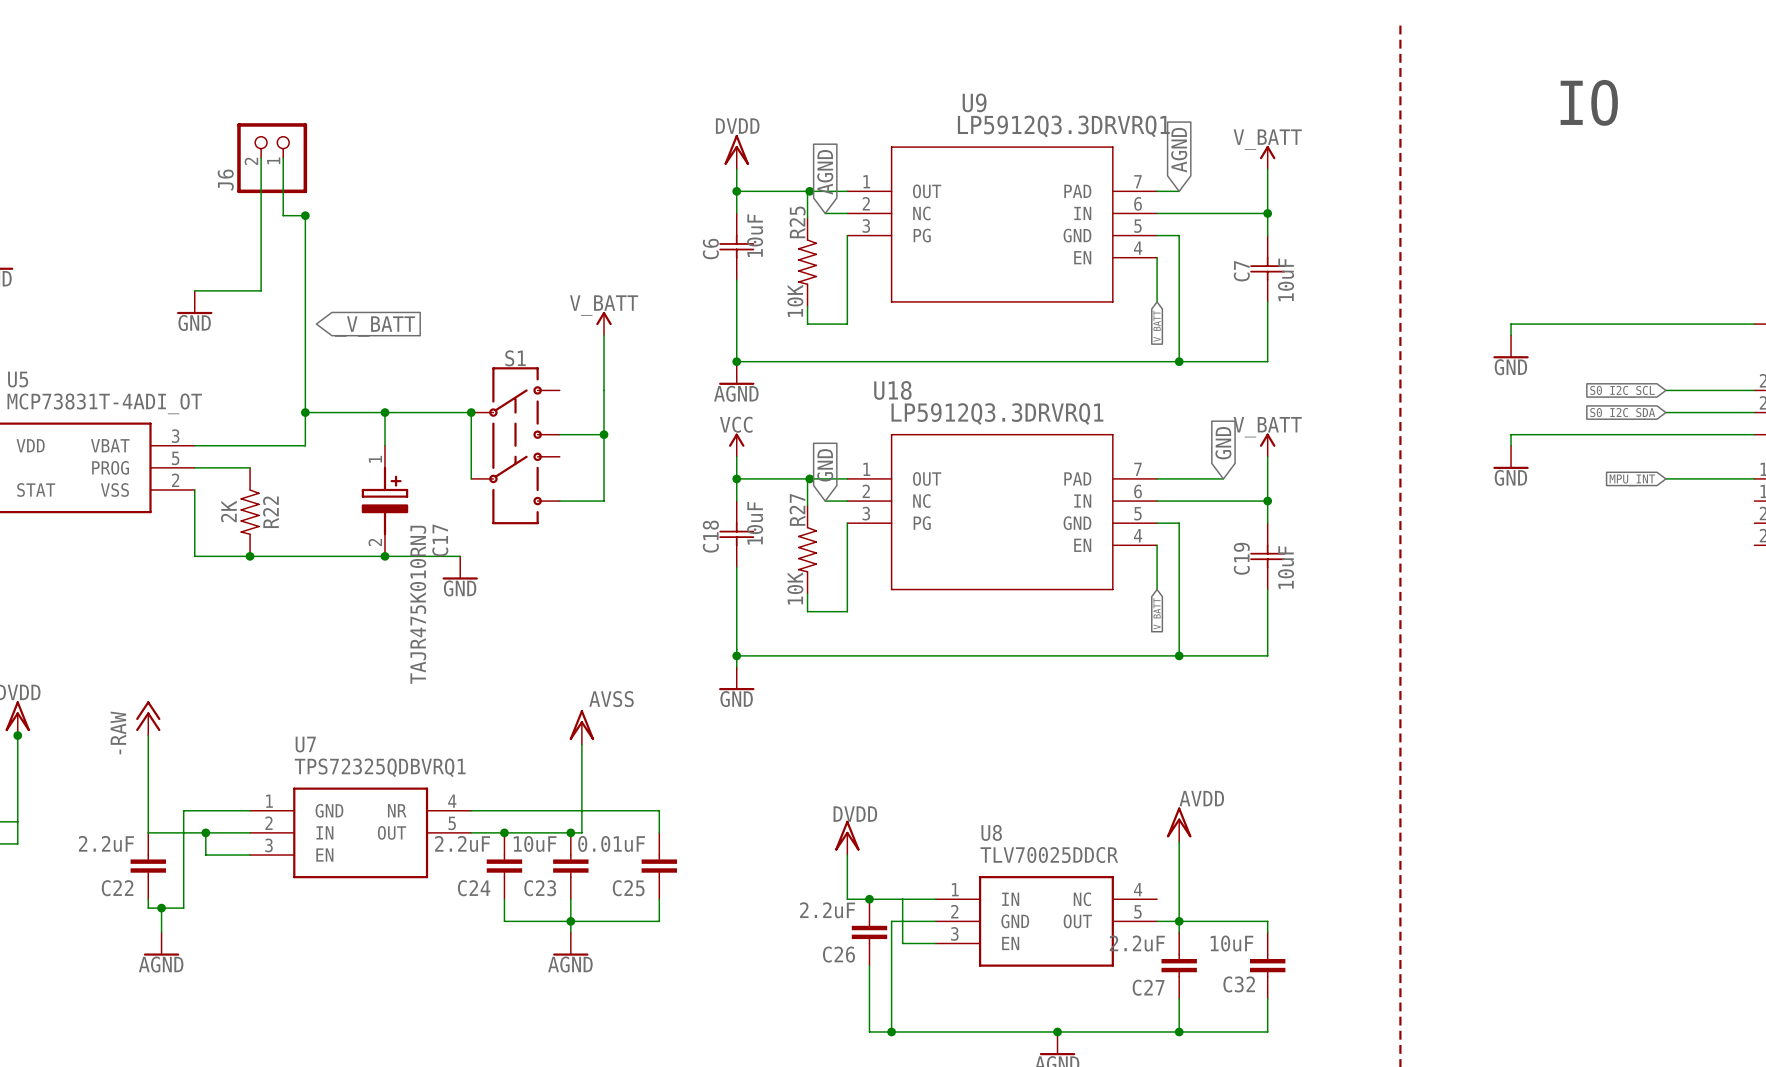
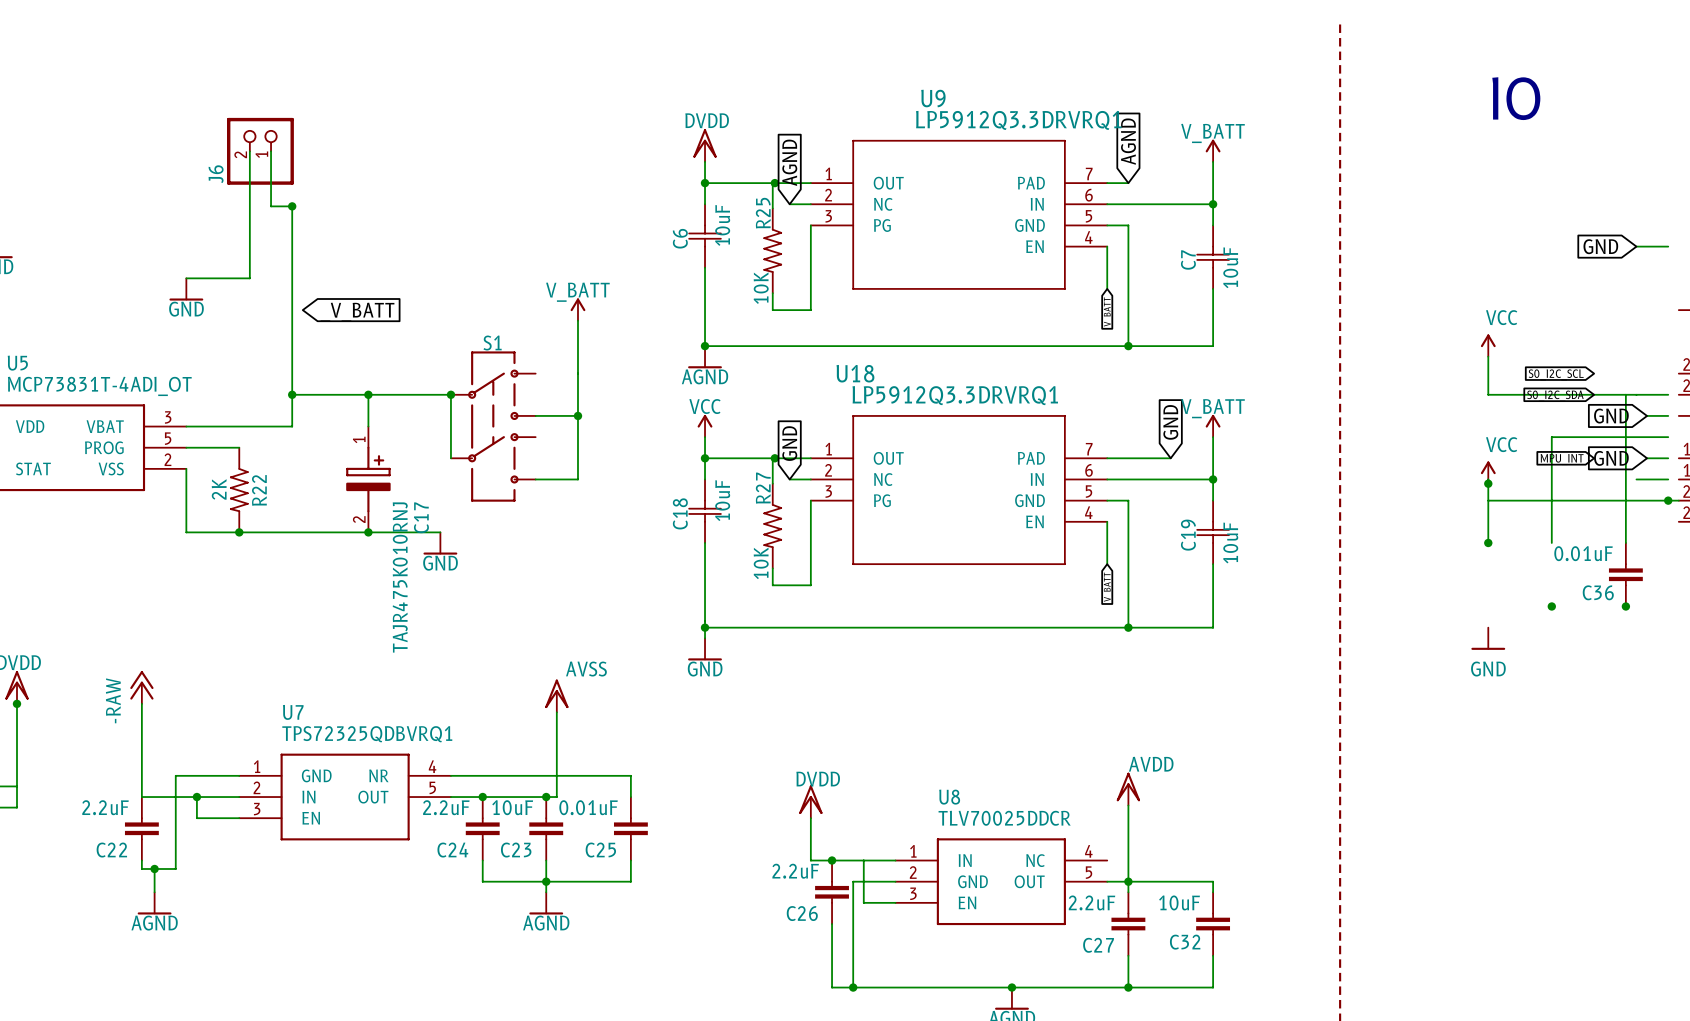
global label: none -> GND (1600, 246)
wire: none -> (1636, 246) (1668, 246)
wire: (1754, 324) (1511, 324) (1511, 335) -> none
power symbol: GND (1511, 346) -> none
power symbol: none -> VCC (1488, 345)
wire: none -> (1488, 356) (1488, 394) (1594, 394)
wire: (1665, 390) (1754, 390) -> none
wire: none -> (1625, 394) (1625, 542)
wire: (1743, 412) (1754, 412) -> none
global label: none -> GND (1611, 416)
wire: (1721, 434) (1511, 434) (1511, 445) -> none
wire: (1743, 434) (1754, 434) -> none
wire: none -> (1668, 437) (1551, 437) (1551, 542)
power symbol: GND (1511, 457) -> none
wire: (1665, 478) (1721, 478) -> none
global label: none -> GND (1611, 458)
wire: (1743, 478) (1754, 478) -> none
power symbol: none -> VCC (1488, 472)
wire: none -> (1488, 479) (1488, 542)
wire: none -> (1636, 479) (1668, 479)
junction: none -> (1488, 483)
wire: none -> (1488, 500) (1678, 500)
junction: none -> (1668, 500)
junction: none -> (1488, 542)
C36: none -> 0.01uF (1625, 574)
junction: none -> (1551, 606)
junction: none -> (1625, 606)
power symbol: none -> GND (1488, 638)

